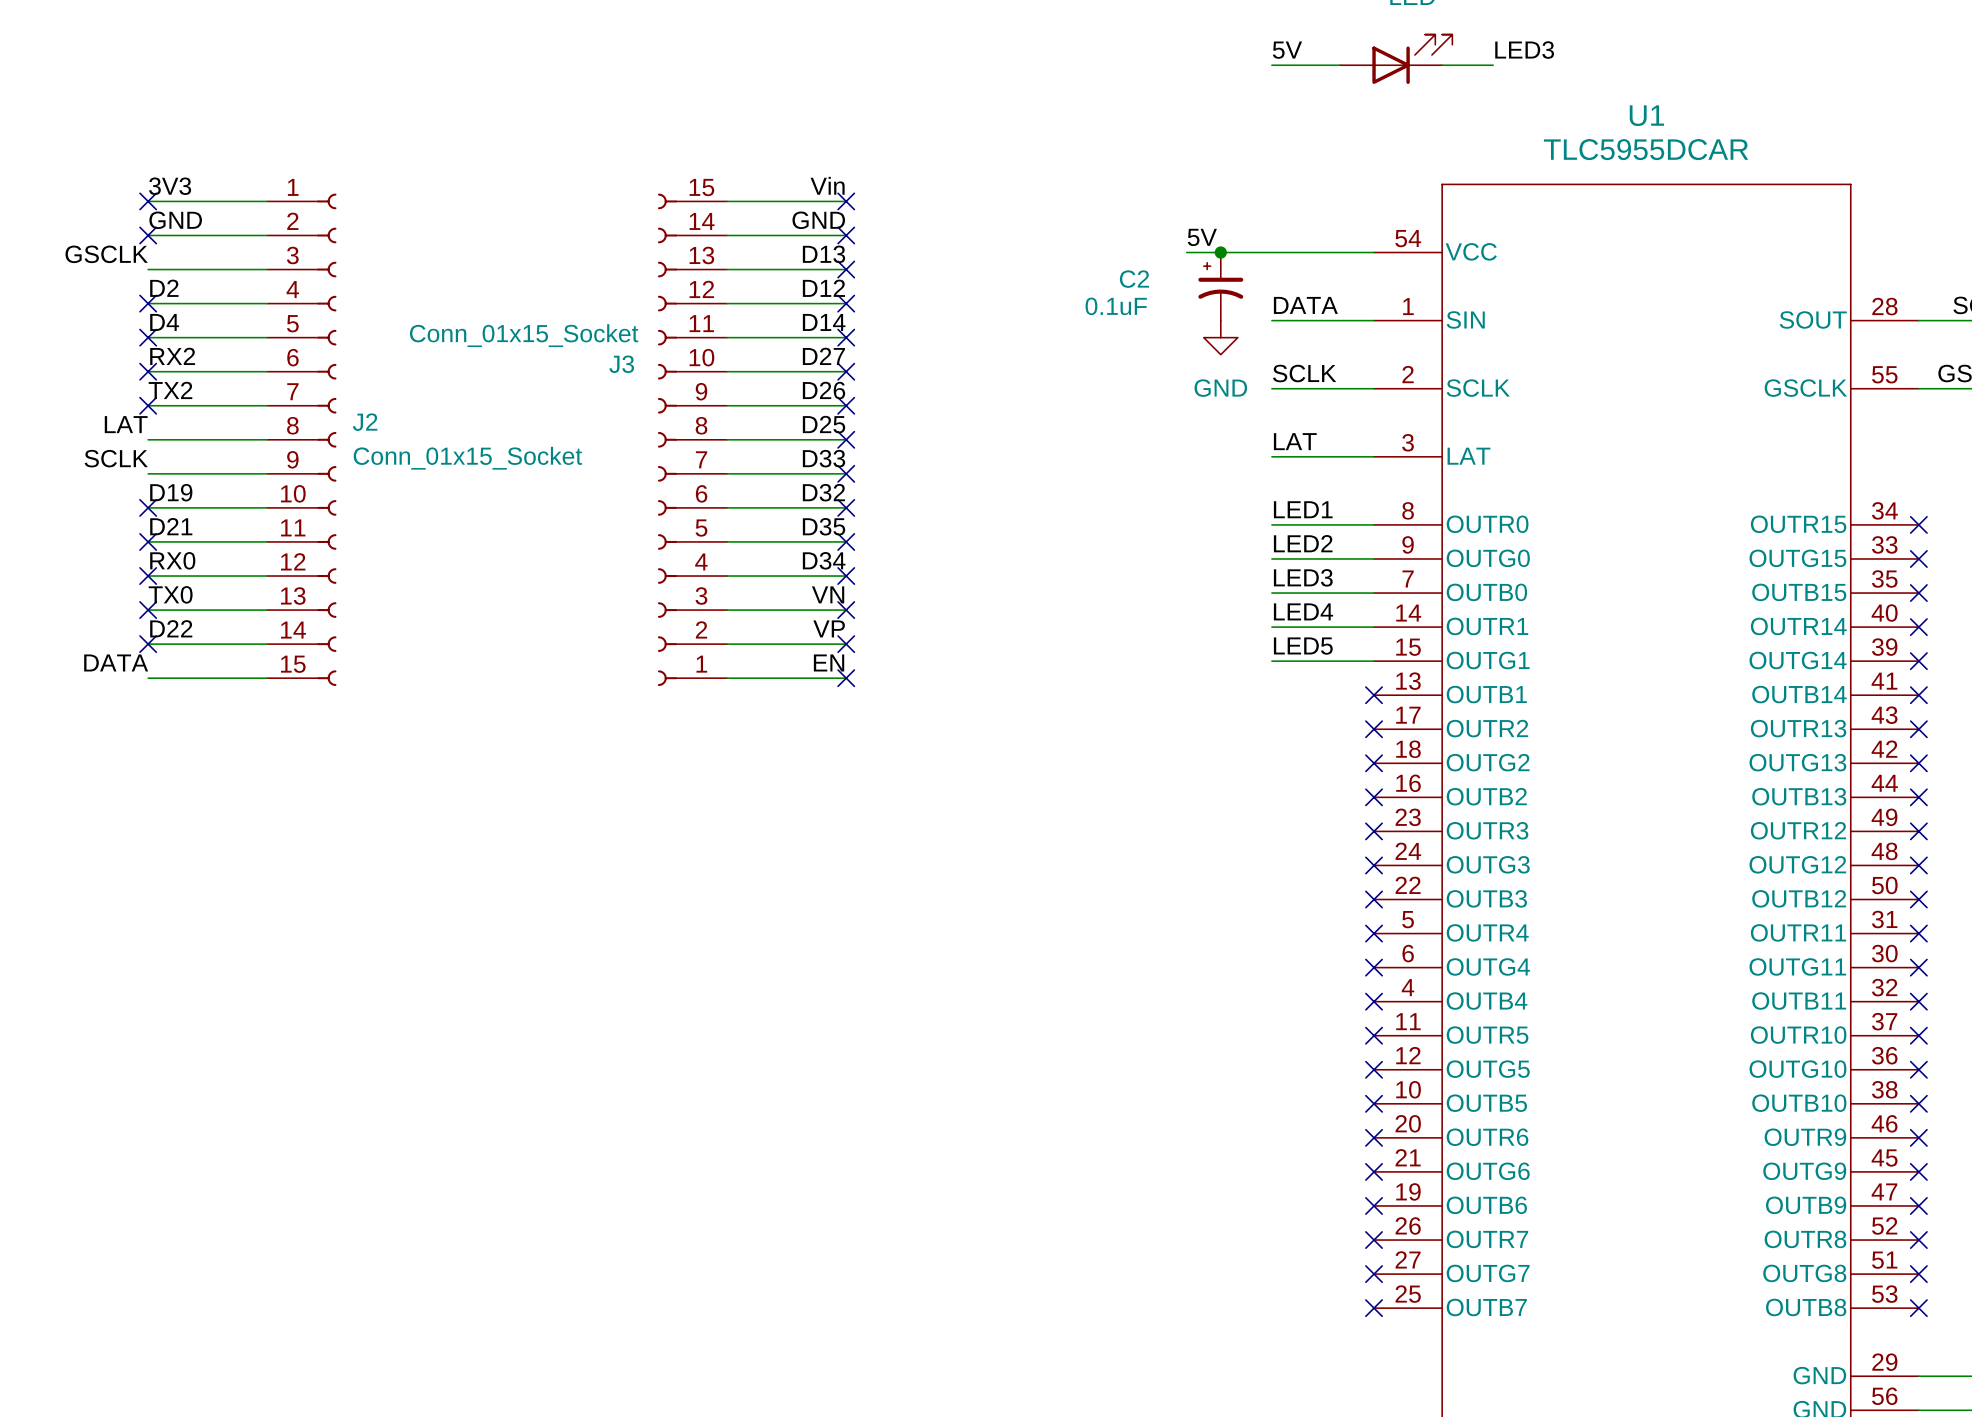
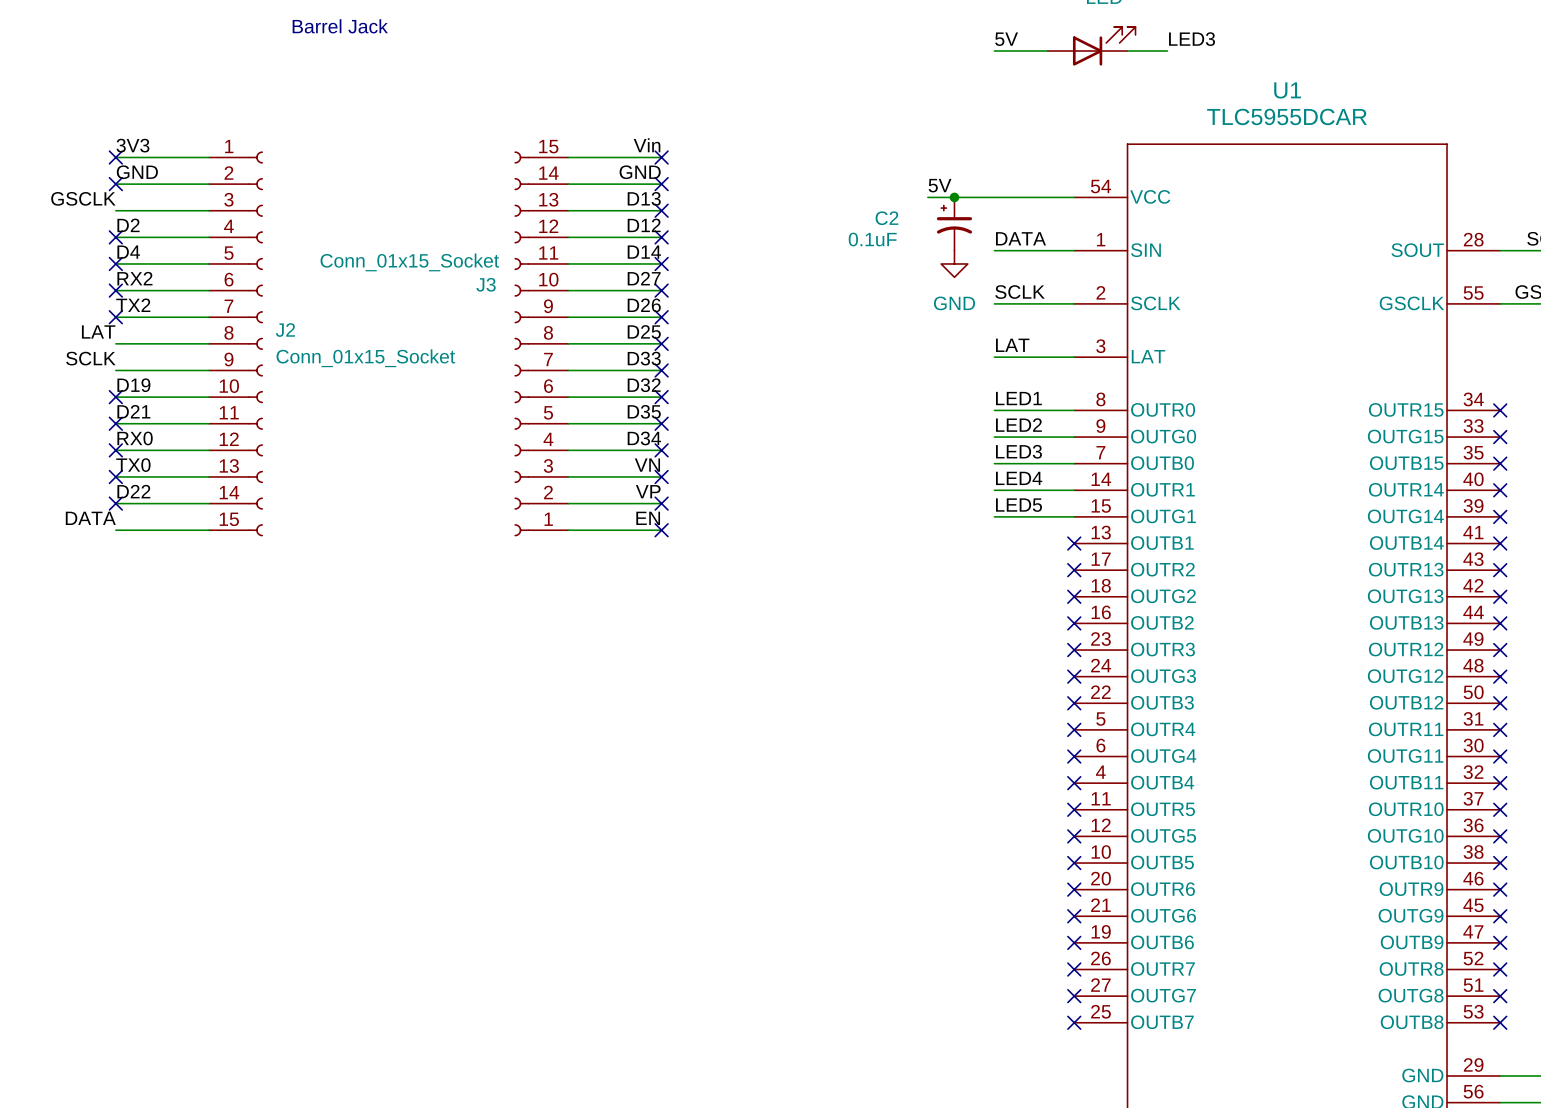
text: none -> Barrel Jack (340, 26)

